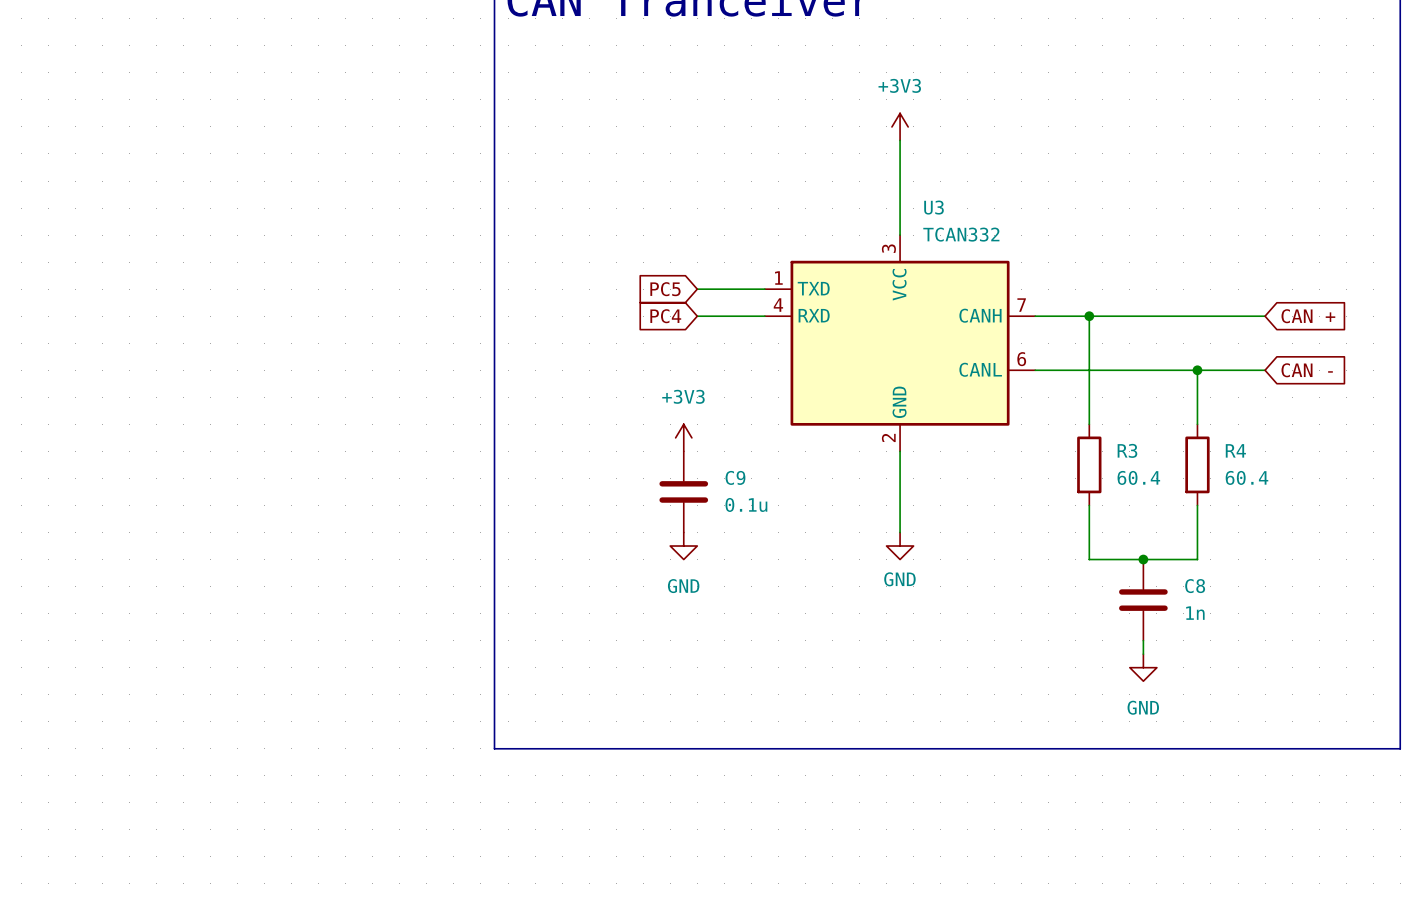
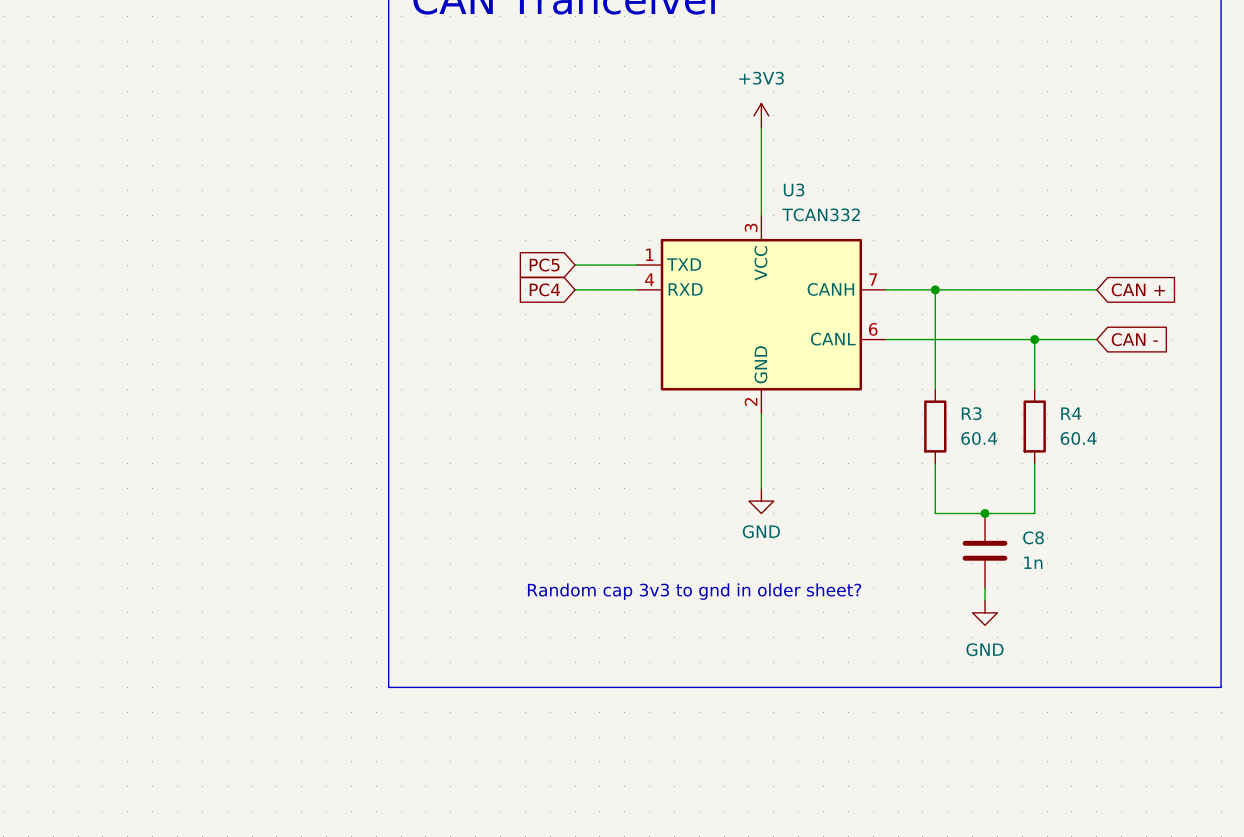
power symbol: +3V3 (683, 437) -> none
C9: 0.1u (683, 491) -> none
power symbol: GND (683, 546) -> none
text: none -> Random cap 3v3 to gnd in older sheet? (694, 591)

